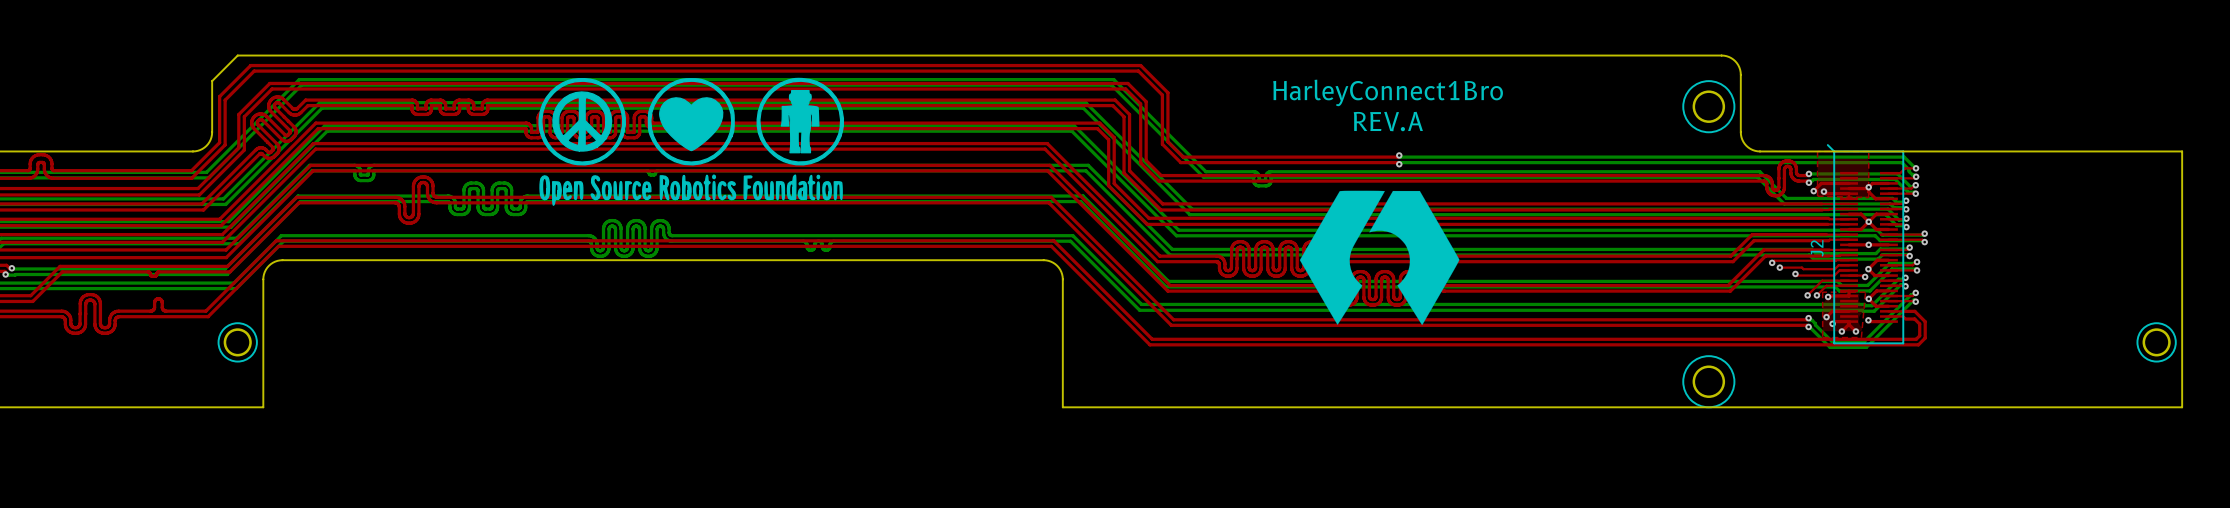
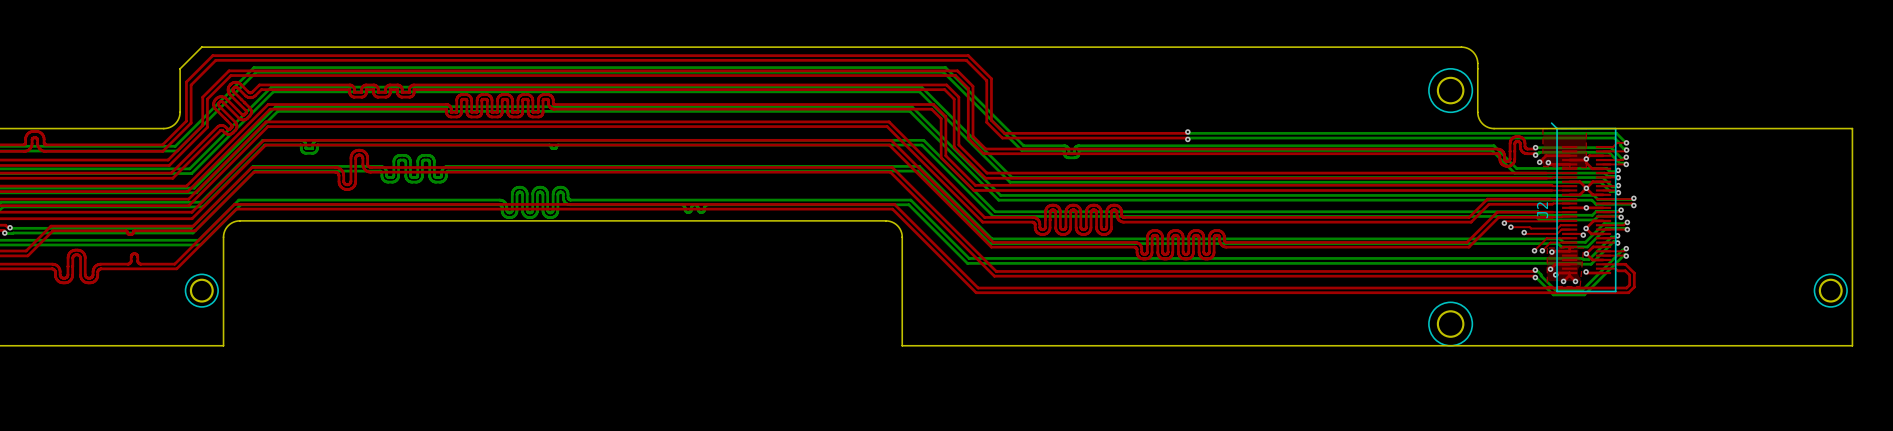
drawing: [538, 77, 845, 206] -> none
text: HarleyConnect1Bro (1388, 92) -> none
text: REV.A (1388, 121) -> none
drawing: [1299, 190, 1460, 326] -> none

